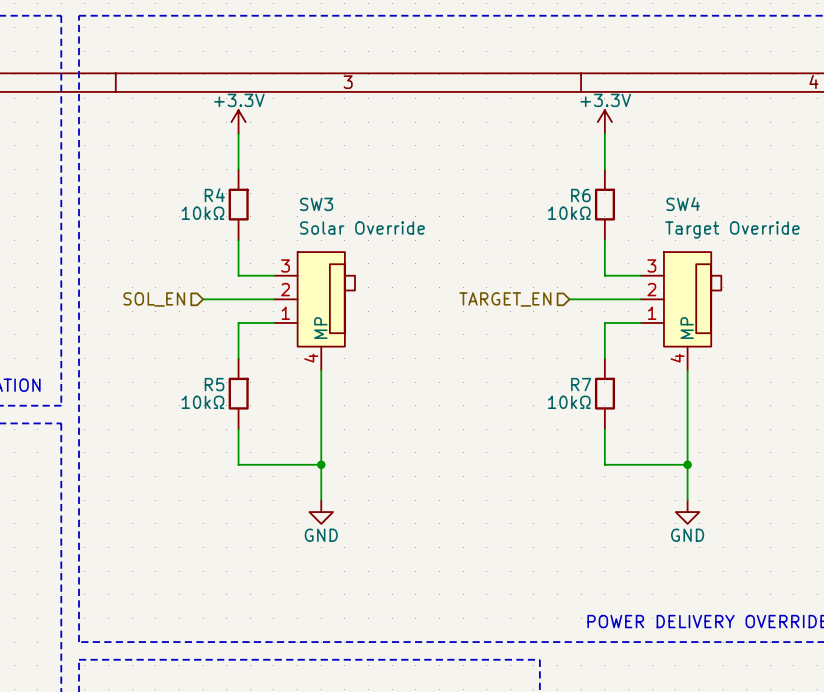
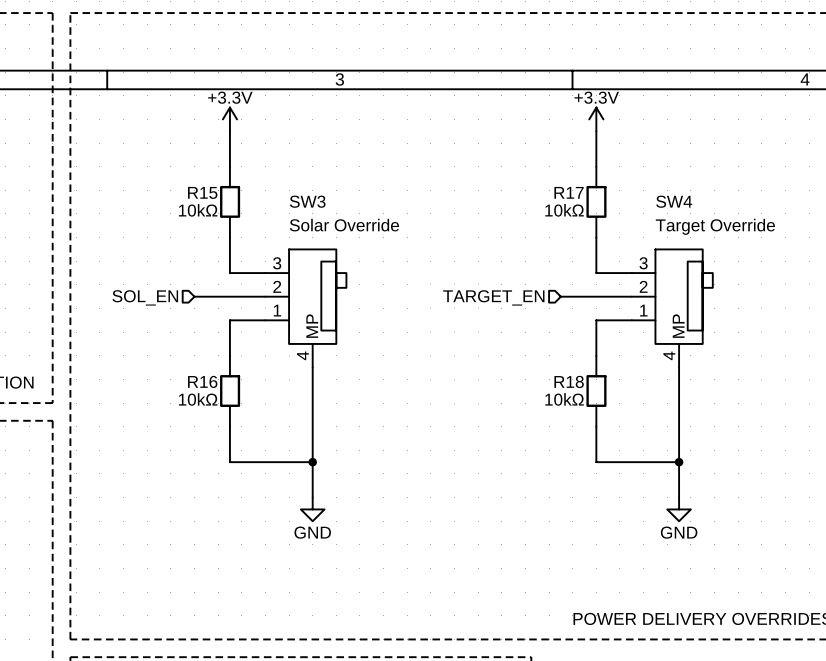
R4 name: R4 (214, 195) -> R15 (202, 192)
R6 name: R6 (580, 195) -> R17 (569, 192)
R5 name: R5 (214, 384) -> R16 (202, 381)
R7 name: R7 (581, 384) -> R18 (569, 381)

